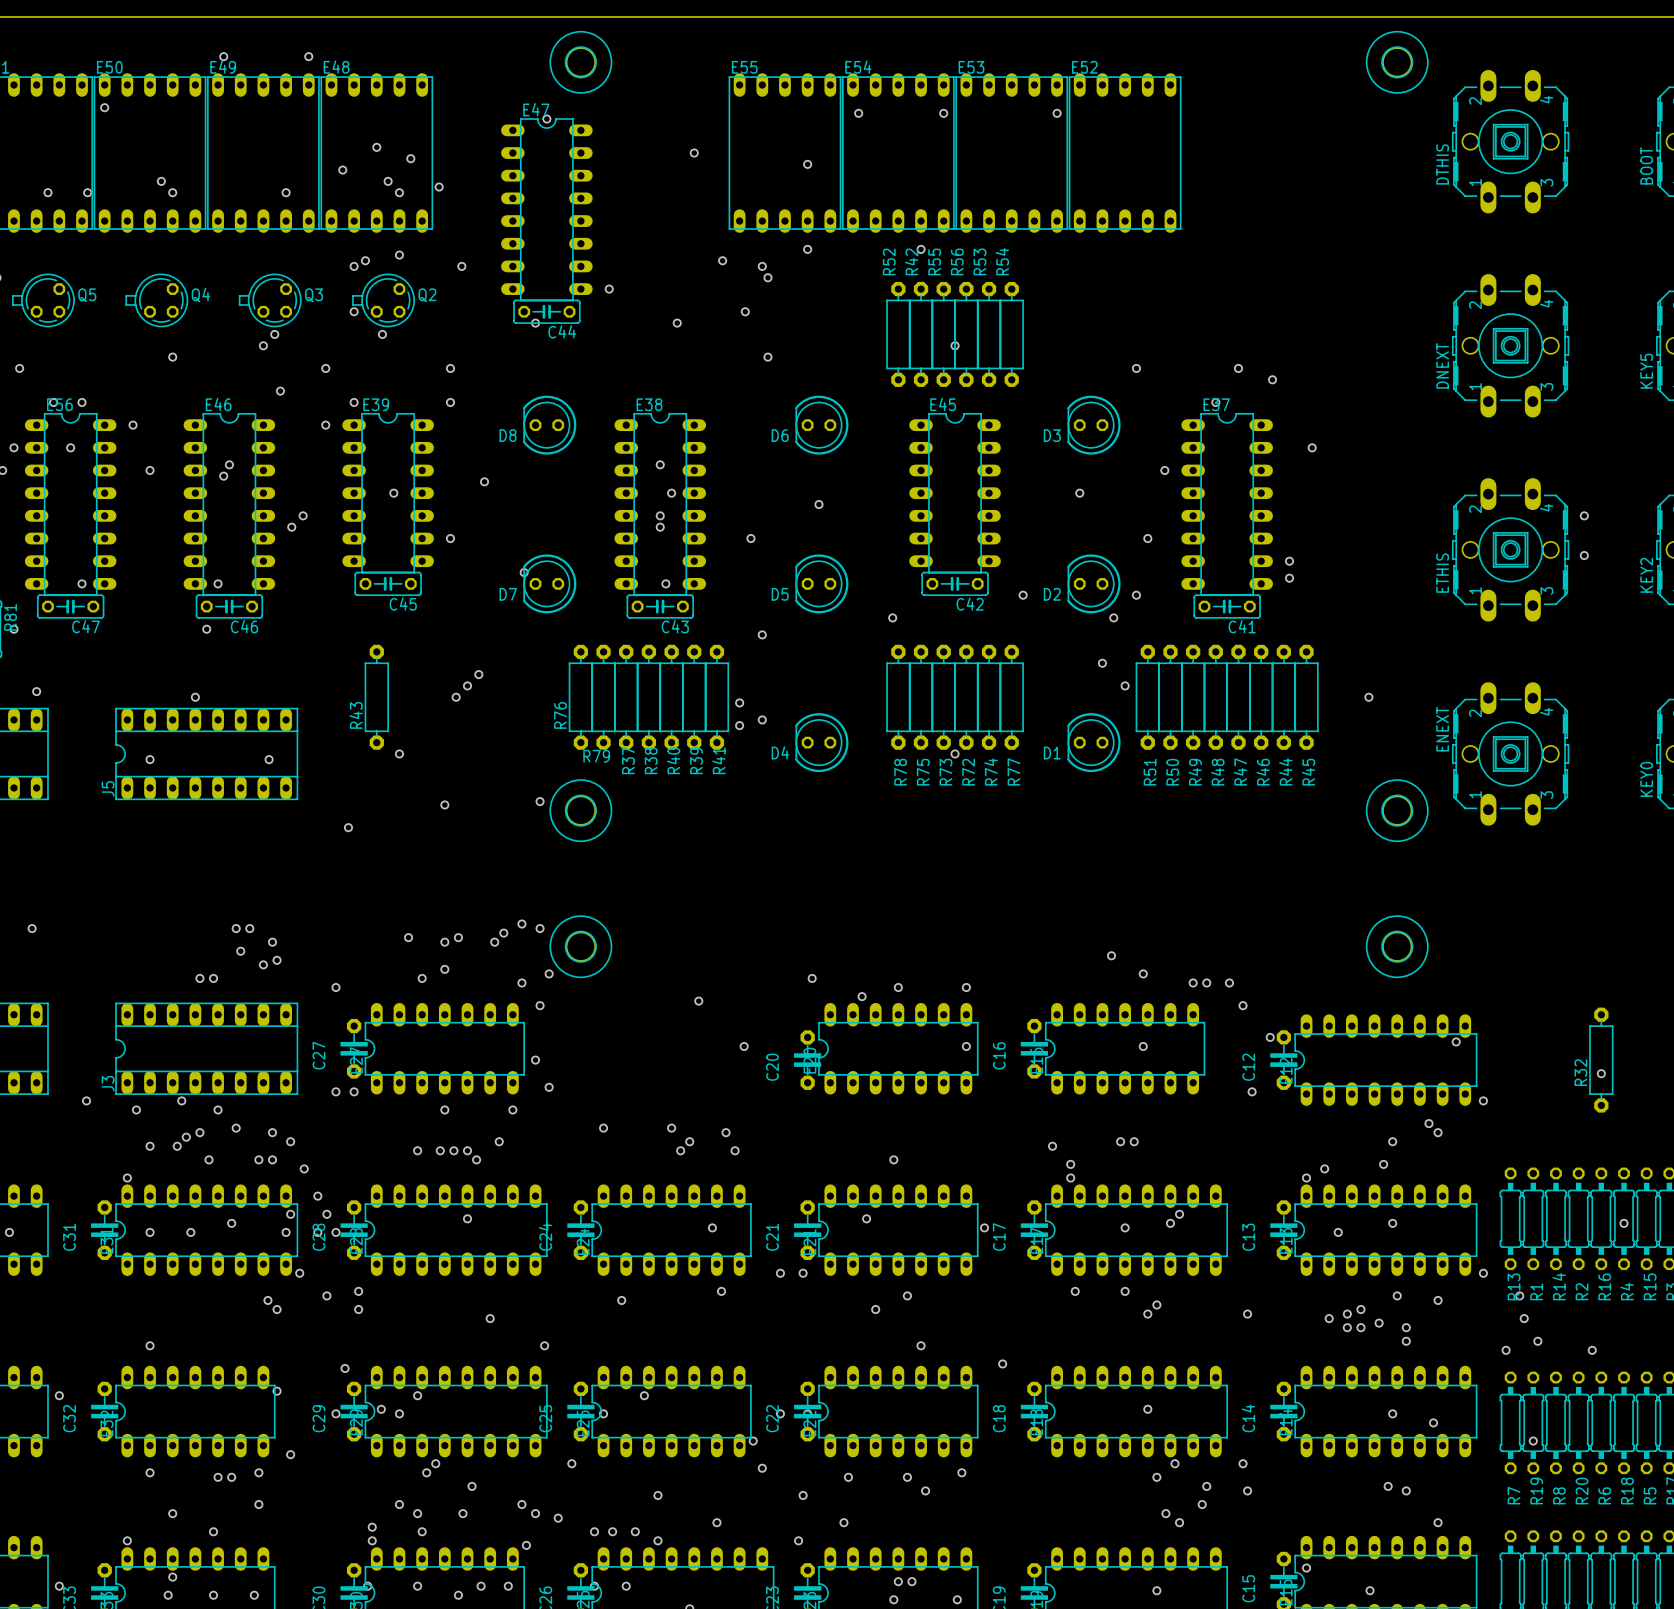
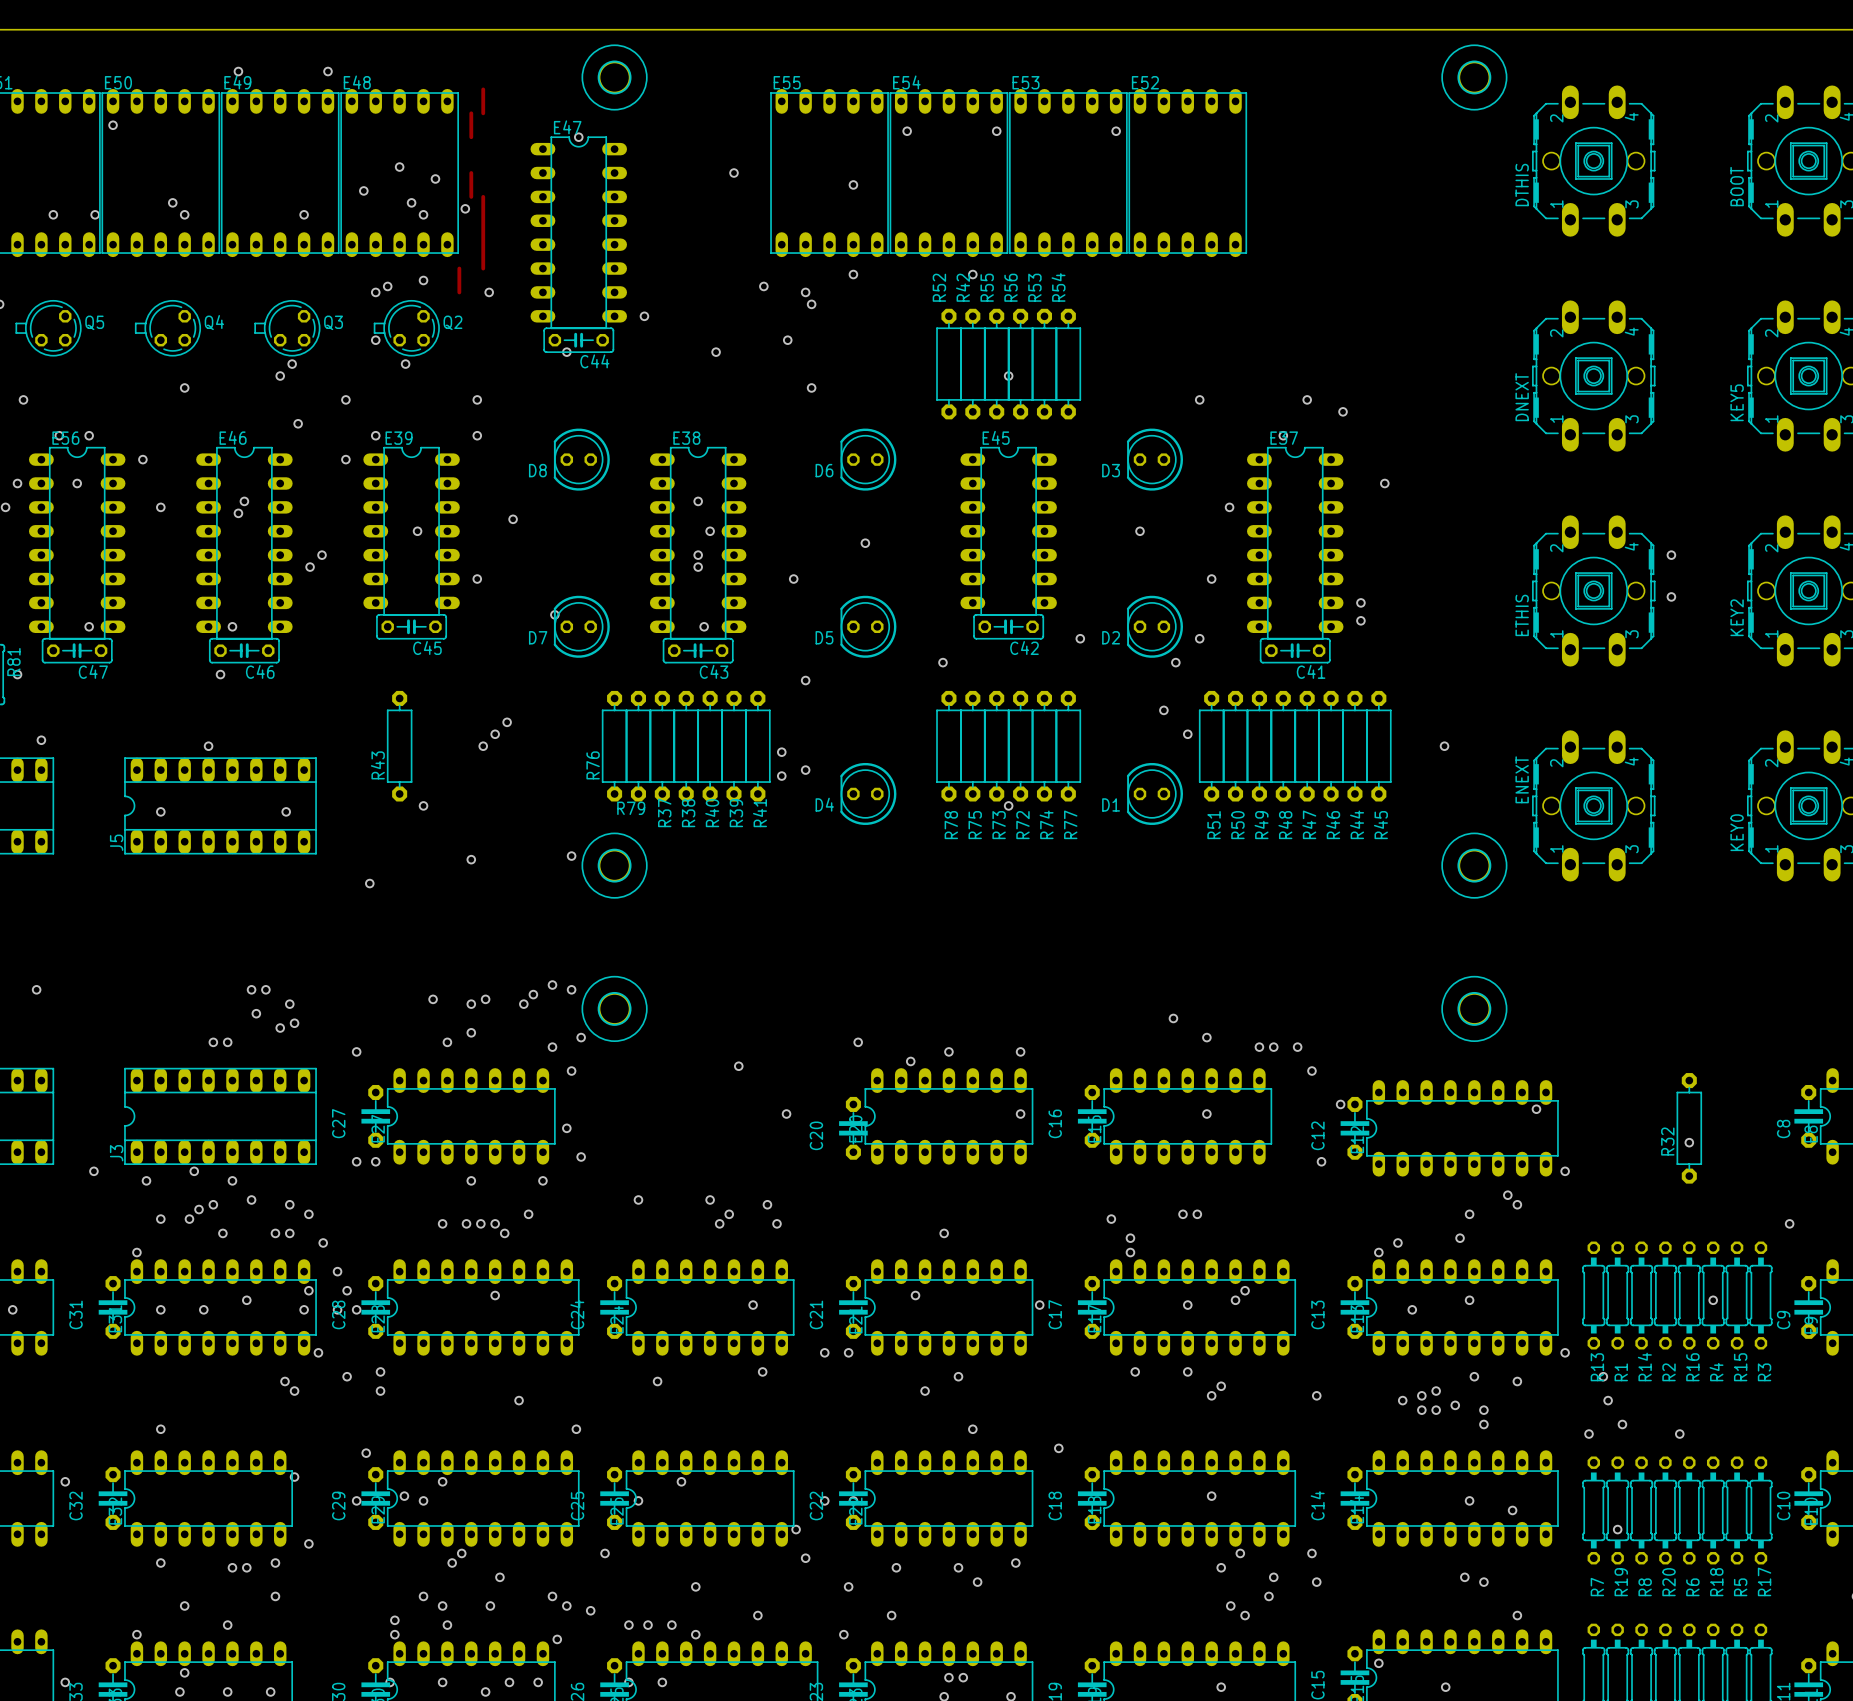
track: none -> (483, 89) (483, 113)
track: none -> (471, 113) (471, 137)
track: none -> (471, 173) (471, 196)
track: none -> (483, 196) (483, 268)
track: none -> (459, 268) (459, 292)

